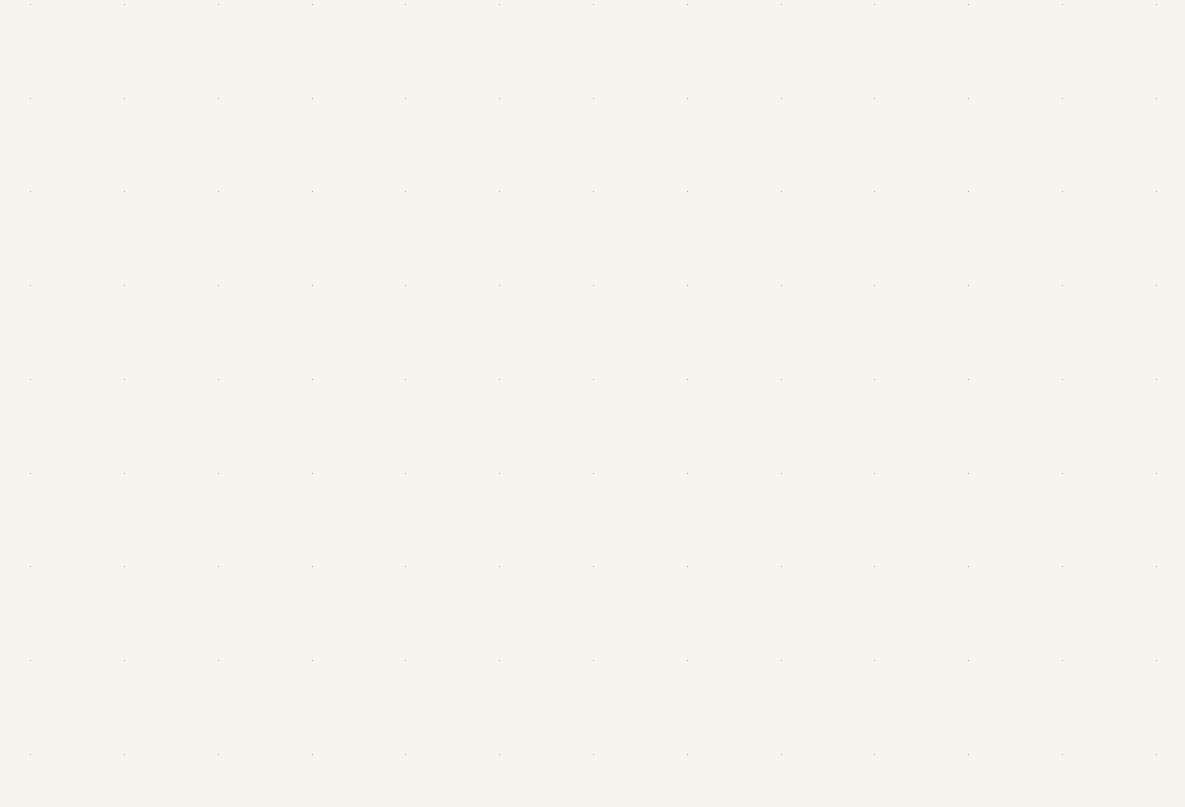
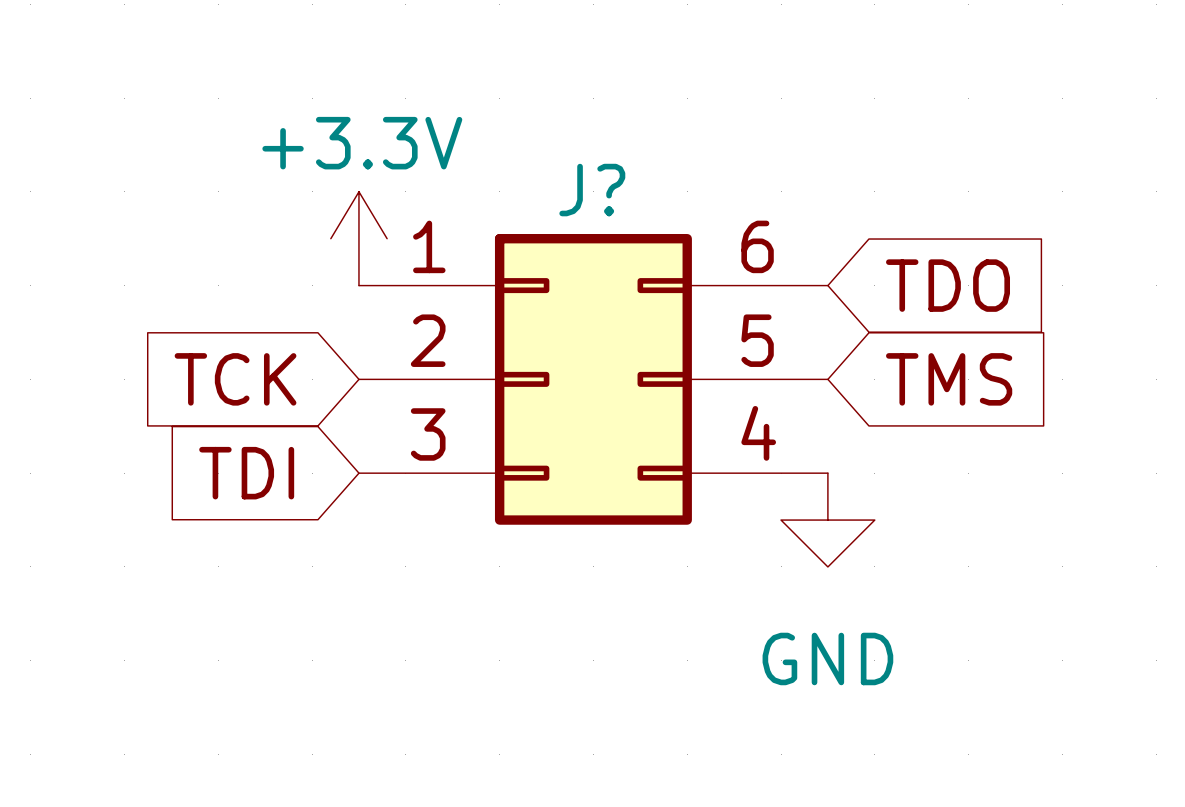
power symbol: none -> +3.3V (358, 238)
global label: none -> TDO (948, 285)
global label: none -> TCK (235, 379)
J?: none -> (593, 379)
global label: none -> TMS (949, 379)
global label: none -> TDI (246, 473)
power symbol: none -> GND (827, 520)

